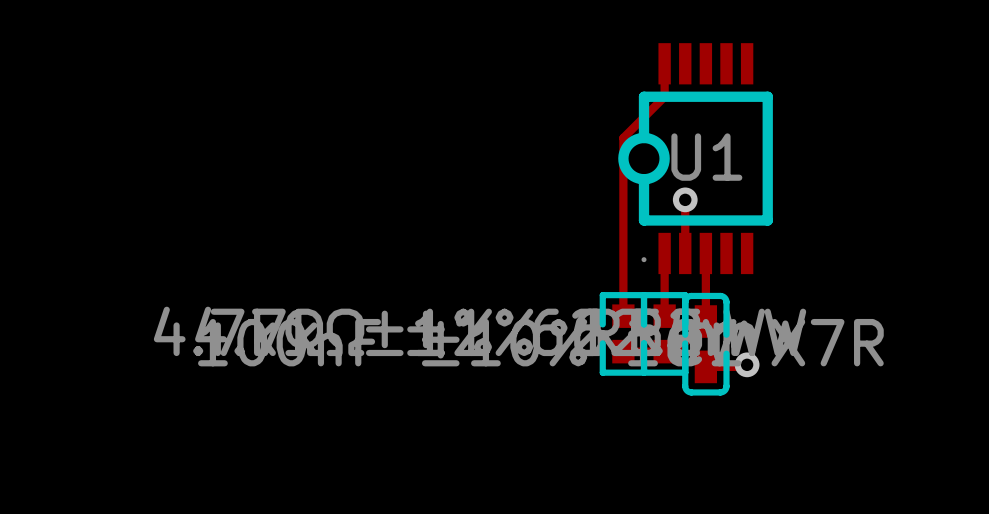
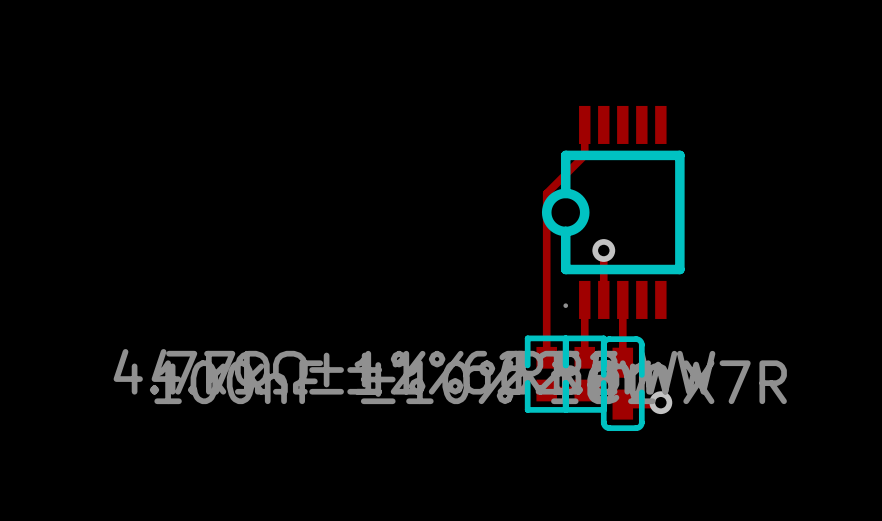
U1 name: U1 (706, 157) -> none

